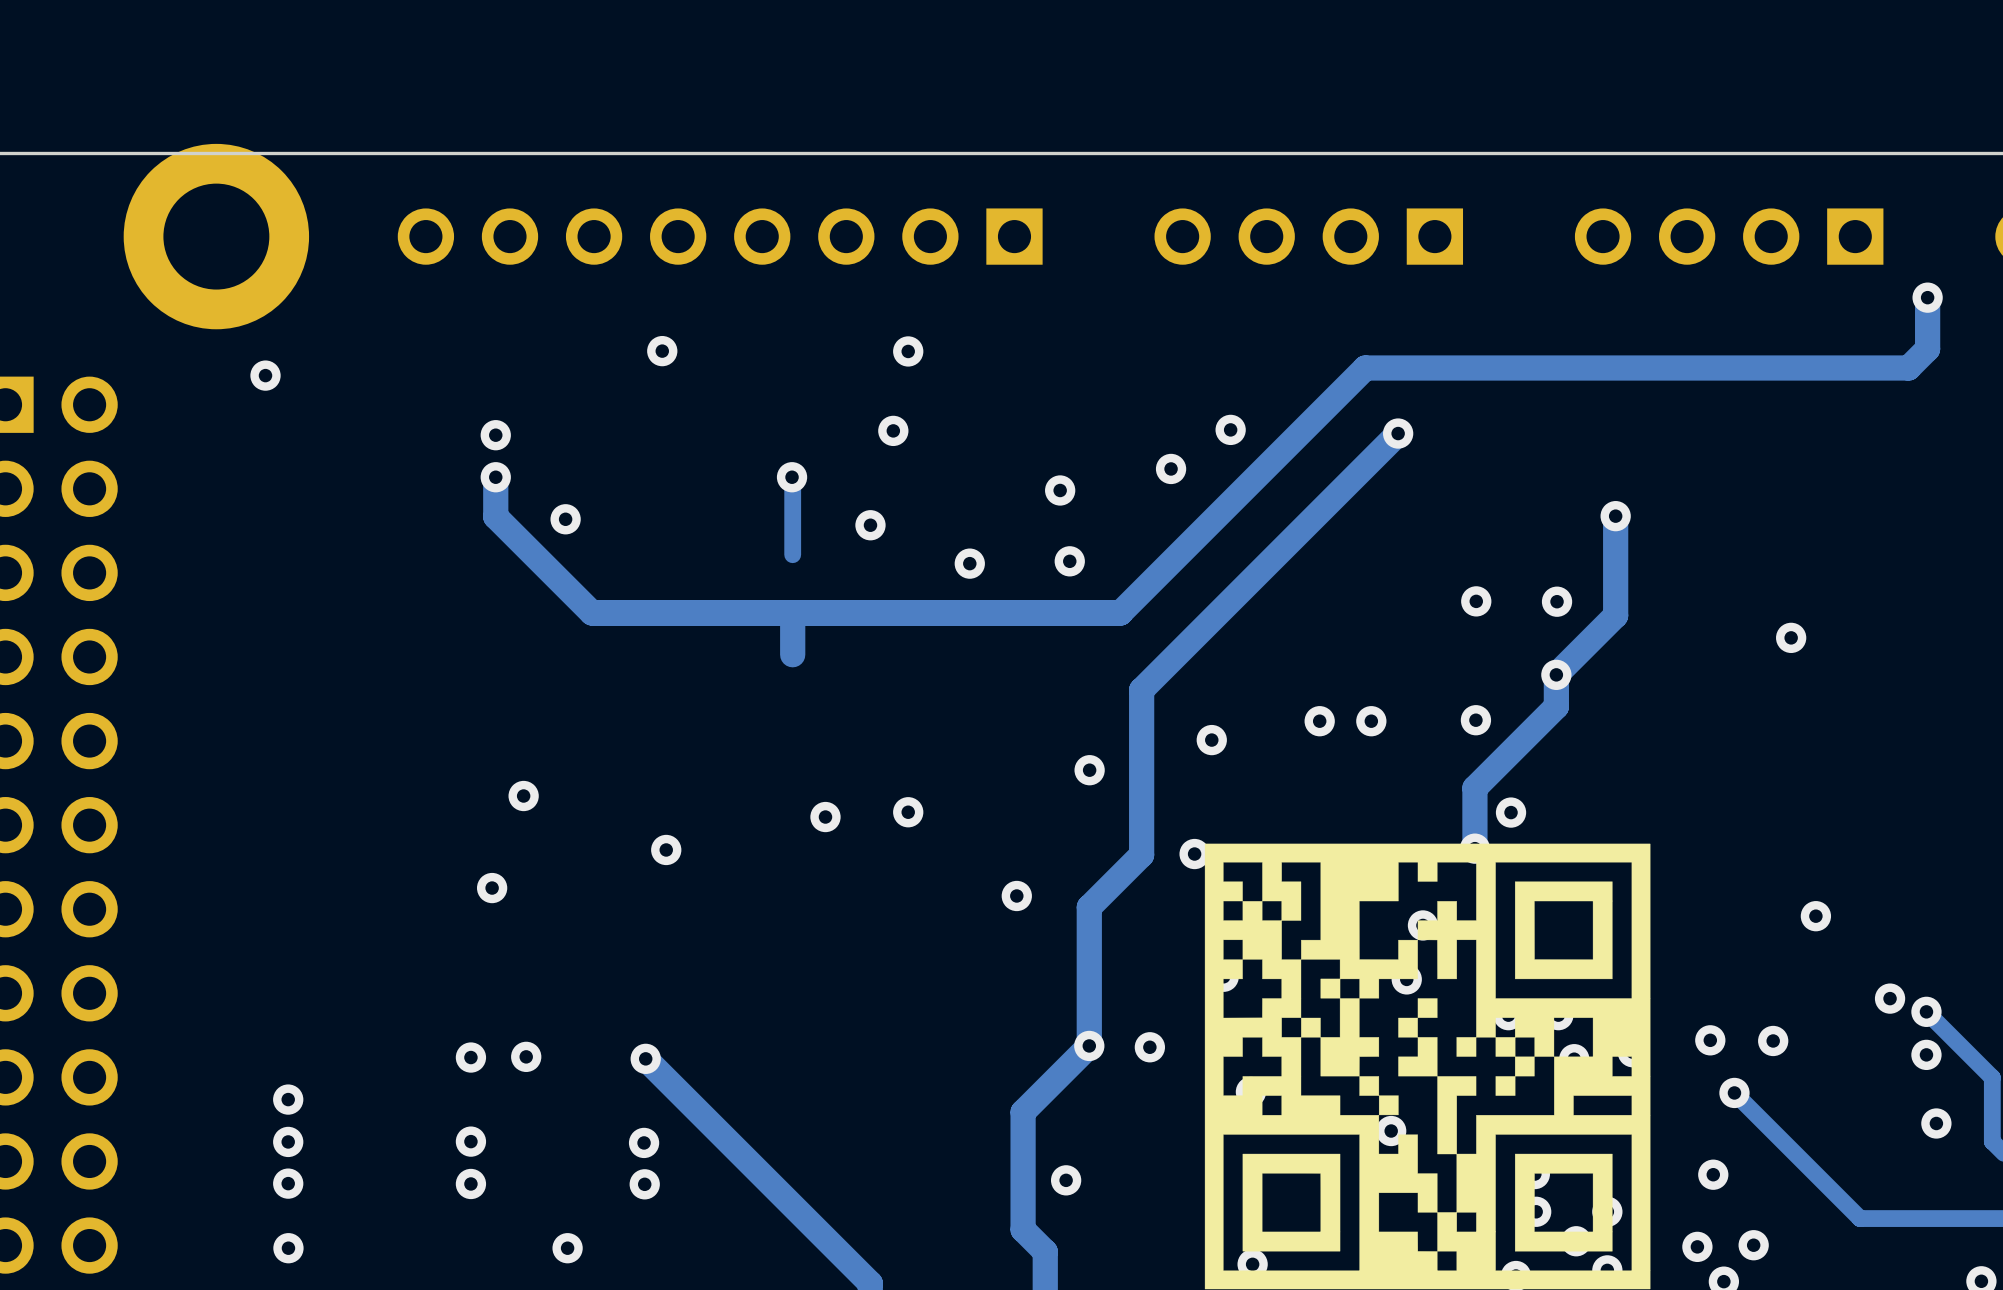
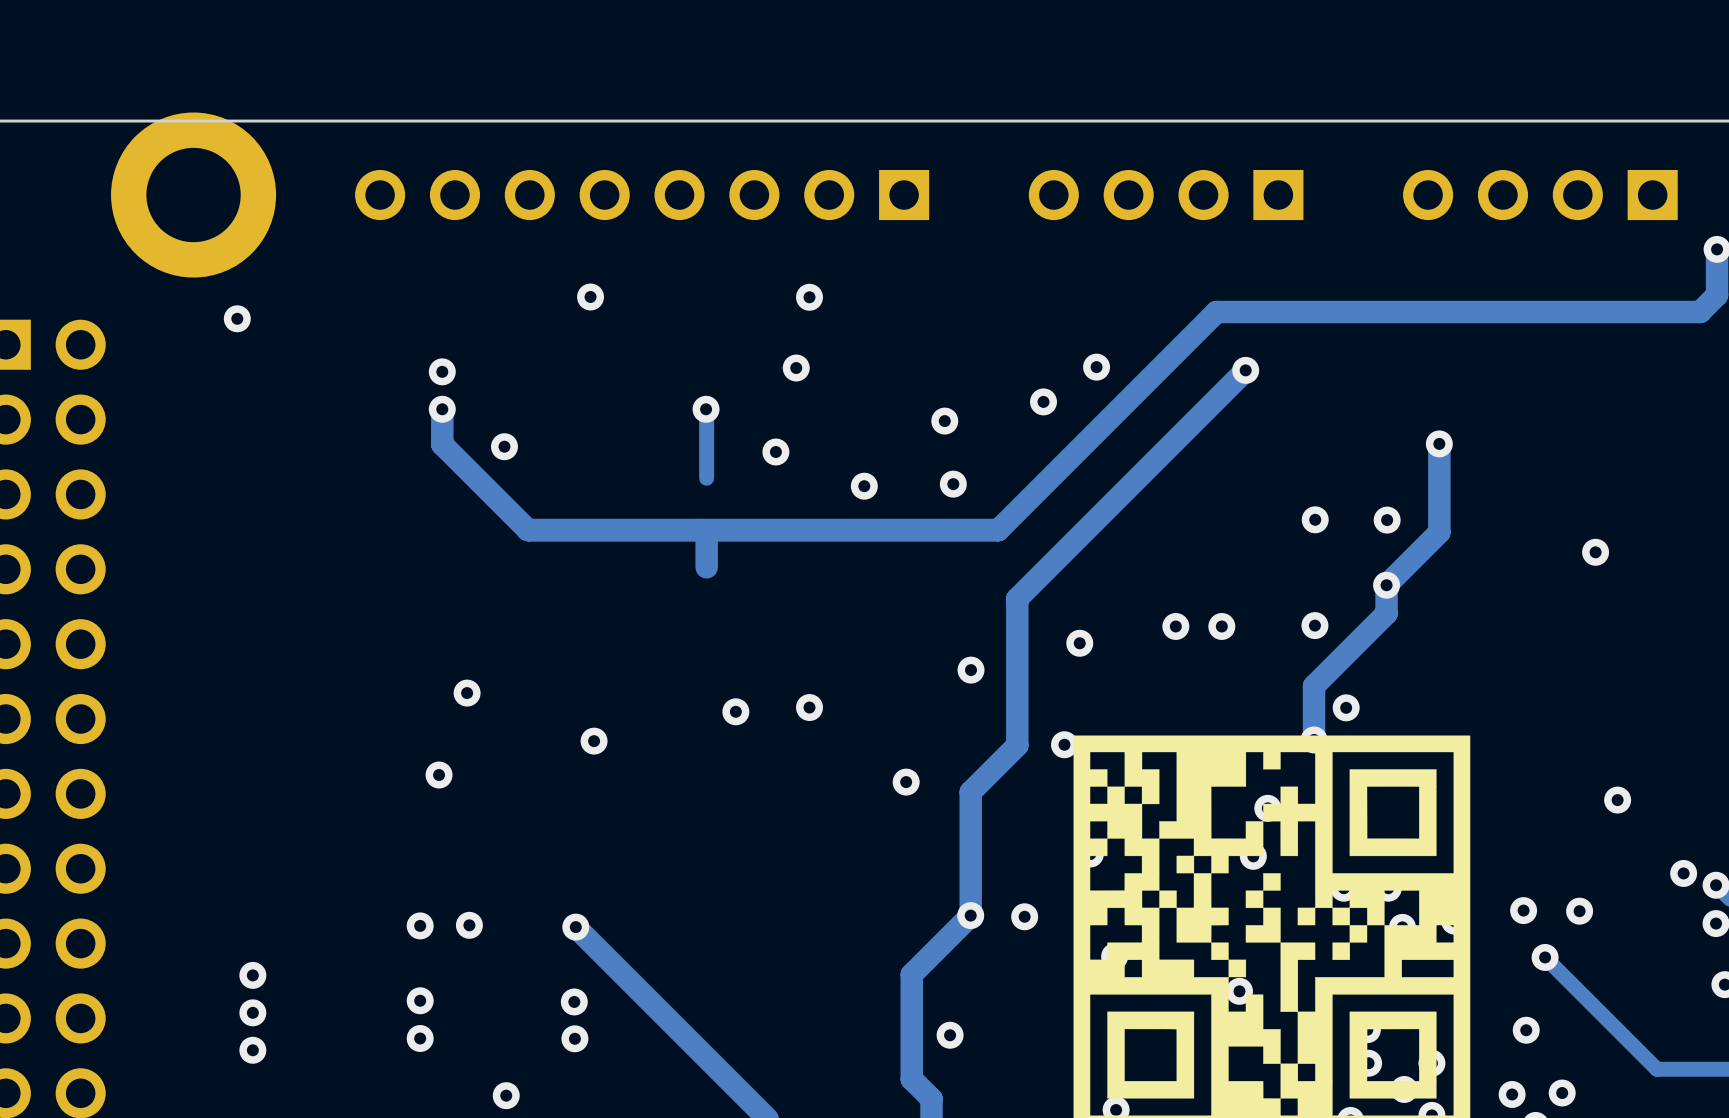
via: (288, 1099) -> none
via: none -> (252, 975)
via: (288, 1141) -> none
via: none -> (252, 1012)
via: (288, 1183) -> none
via: none -> (252, 1050)
via: (288, 1248) -> none

